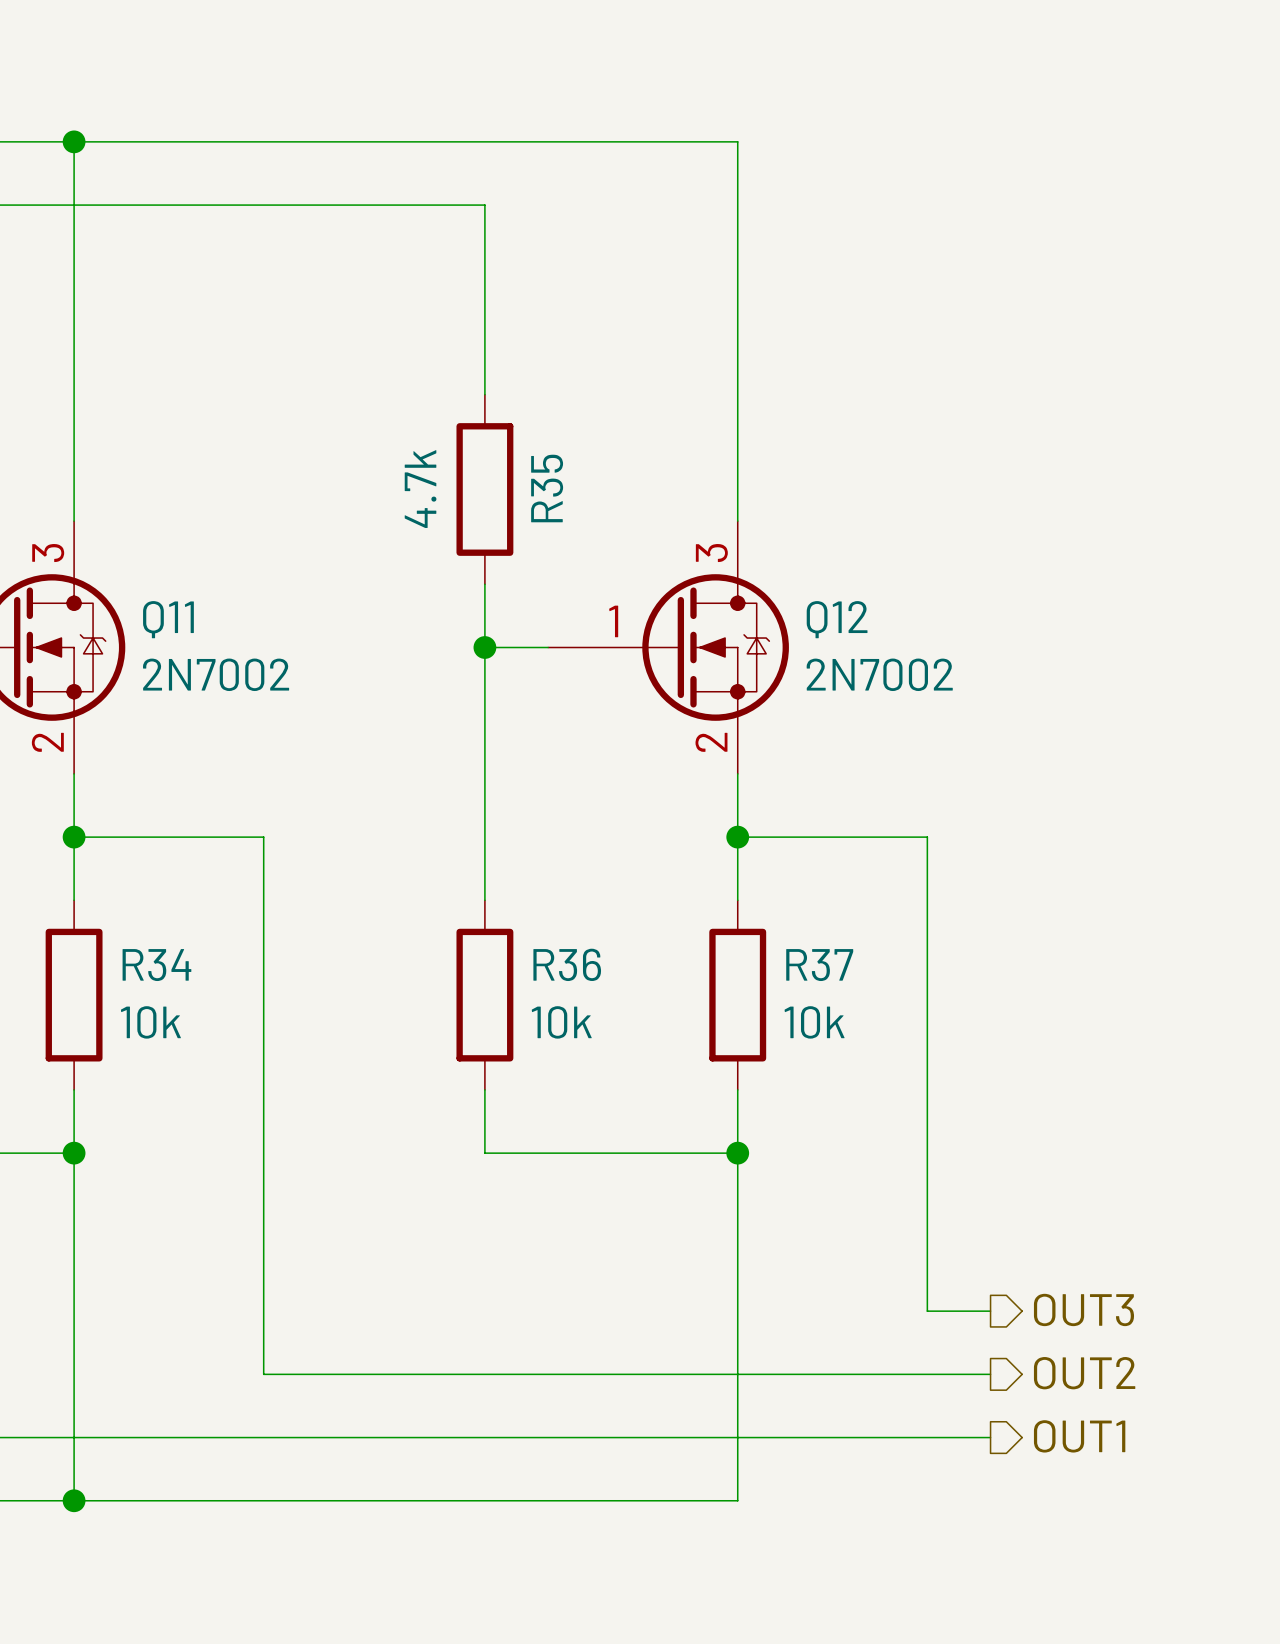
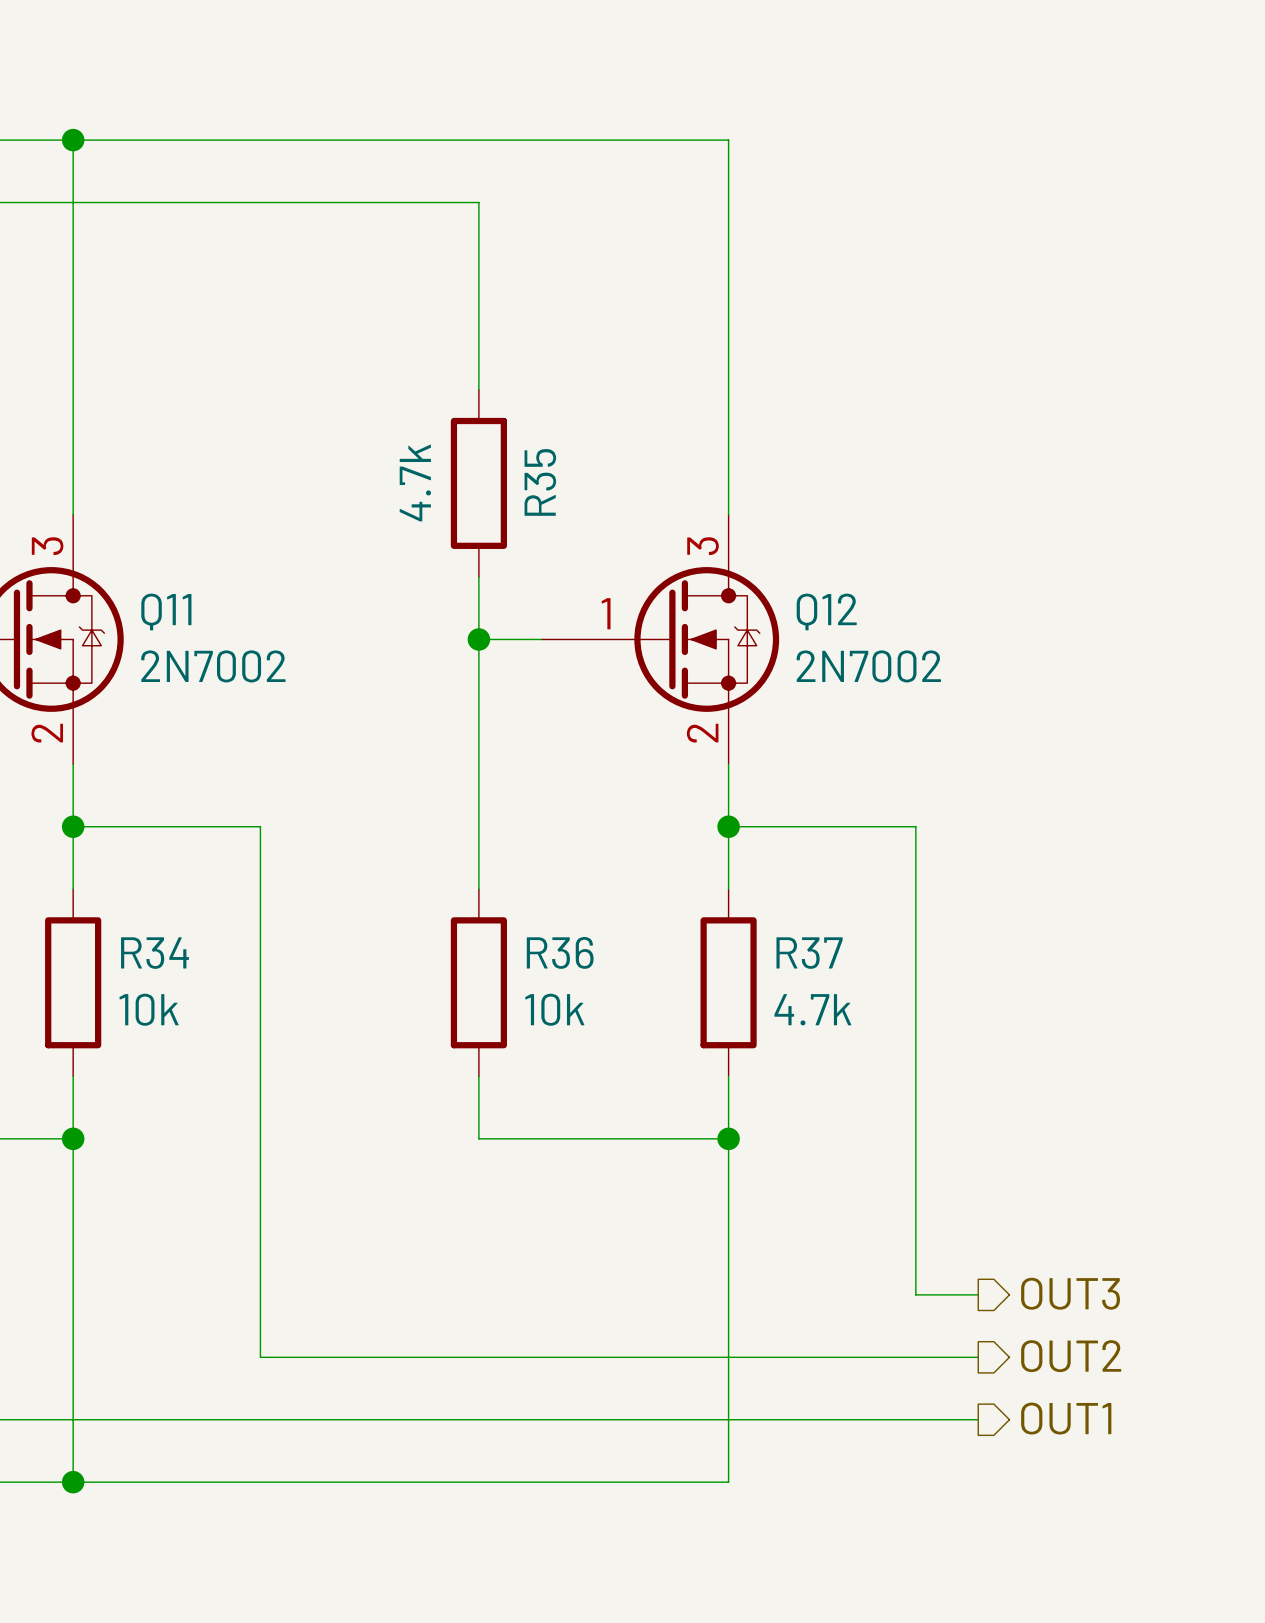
R37 value: 10k (814, 1022) -> 4.7k (812, 1009)

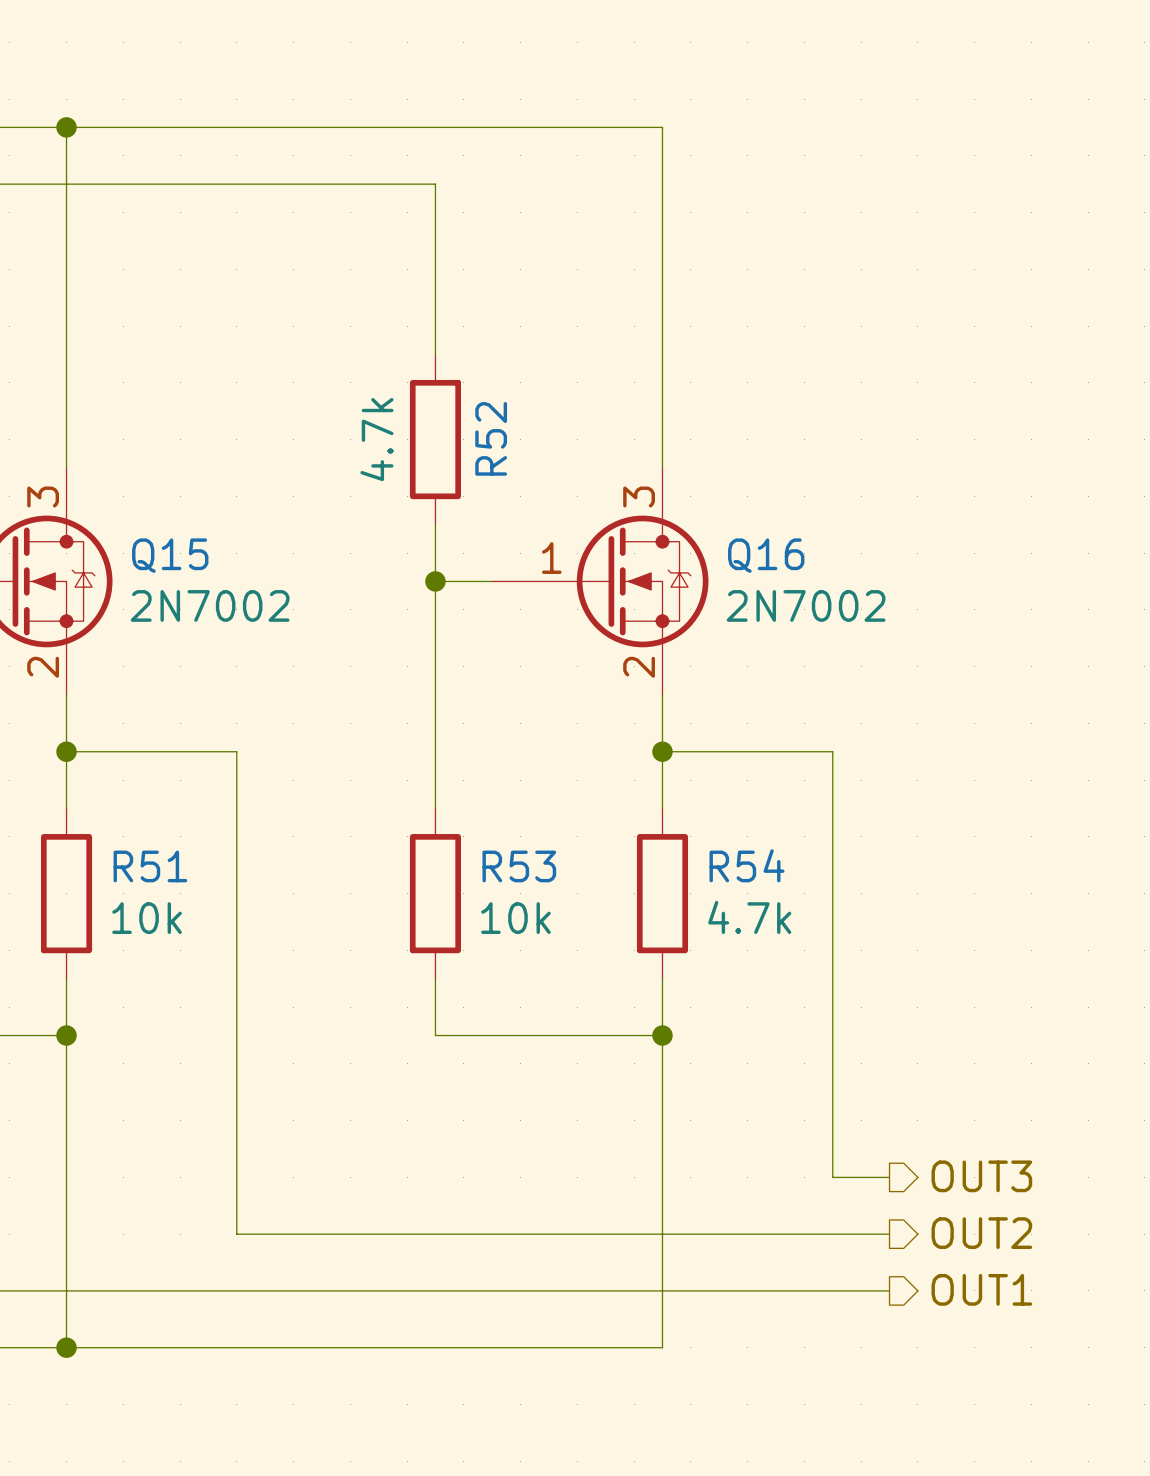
R35 name: R35 (540, 482) -> R52 (491, 438)
Q11 name: Q11 (166, 611) -> Q15 (170, 555)
Q12 name: Q12 (826, 611) -> Q16 (766, 555)
R36 name: R36 (560, 952) -> R53 (519, 866)
R34 name: R34 (155, 953) -> R51 (150, 866)
R37 name: R37 (809, 953) -> R54 (747, 865)

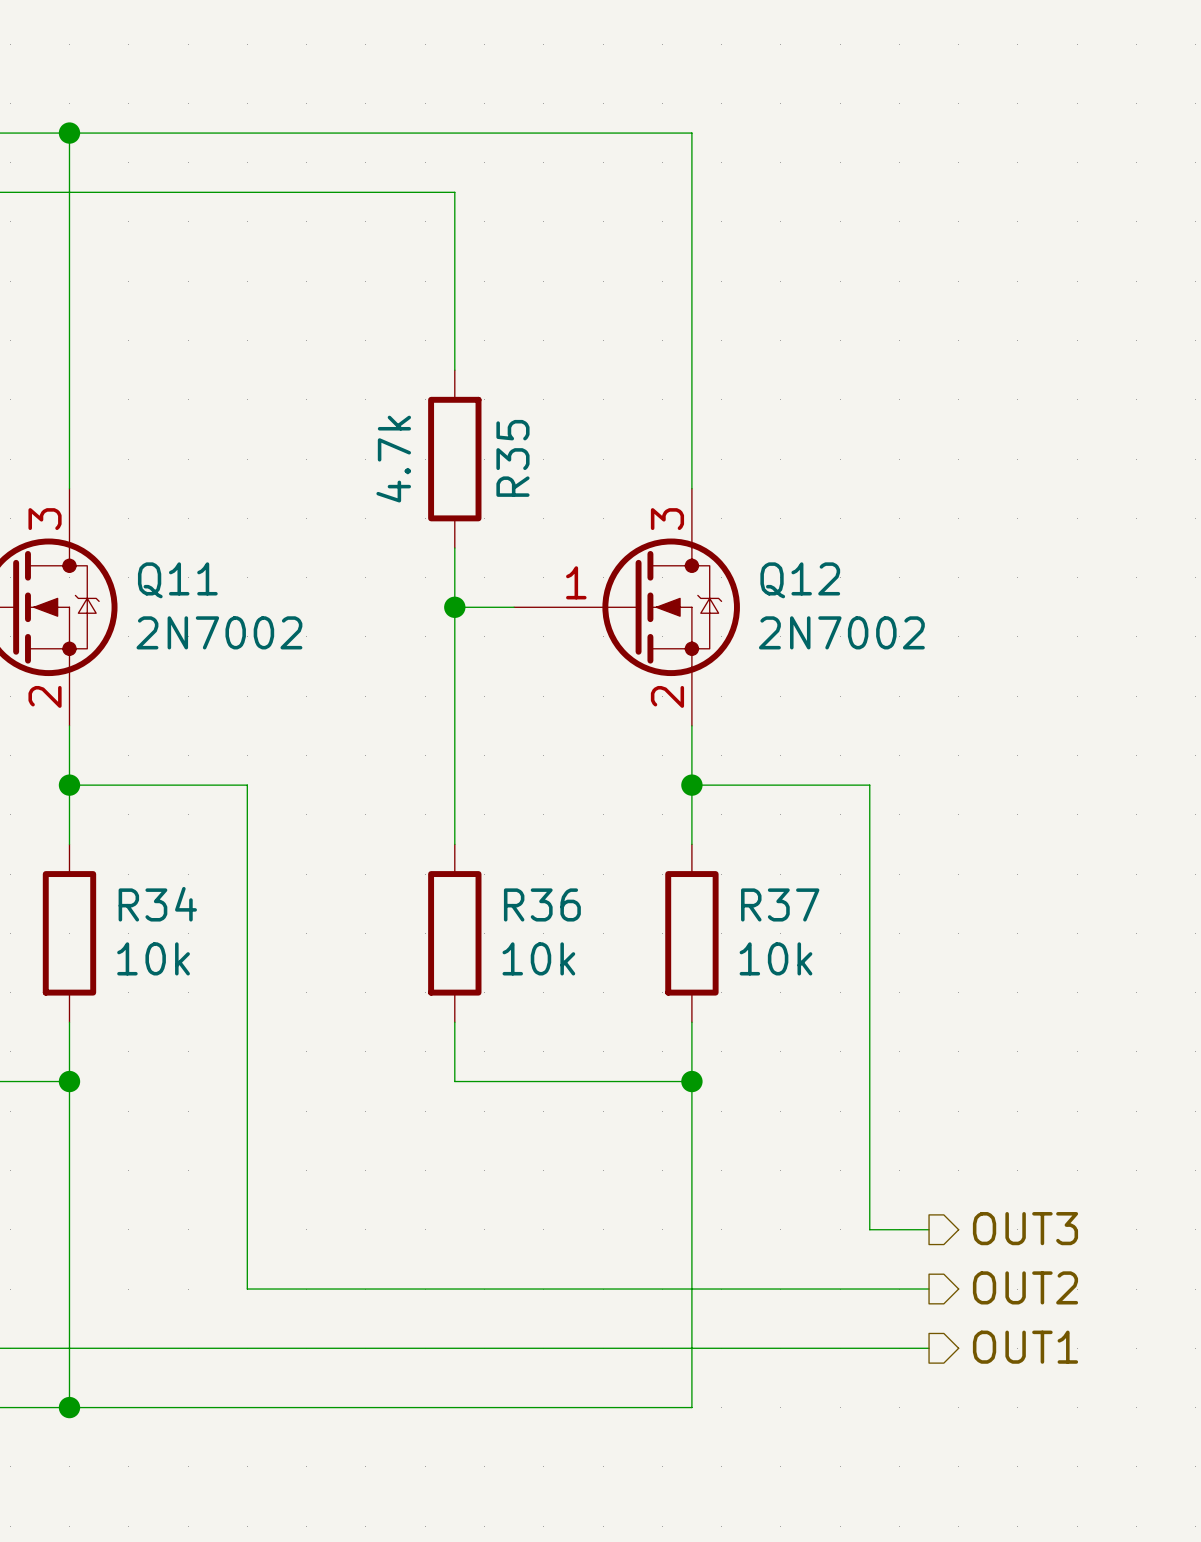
R52 name: R52 (491, 438) -> R35 (512, 458)
Q15 name: Q15 (170, 555) -> Q11 (177, 580)
Q16 name: Q16 (766, 555) -> Q12 (800, 580)
R54 name: R54 (747, 865) -> R37 (780, 904)
R51 name: R51 (150, 866) -> R34 (157, 904)
R53 name: R53 (519, 866) -> R36 (542, 904)
R54 value: 4.7k (749, 917) -> 10k (775, 958)

